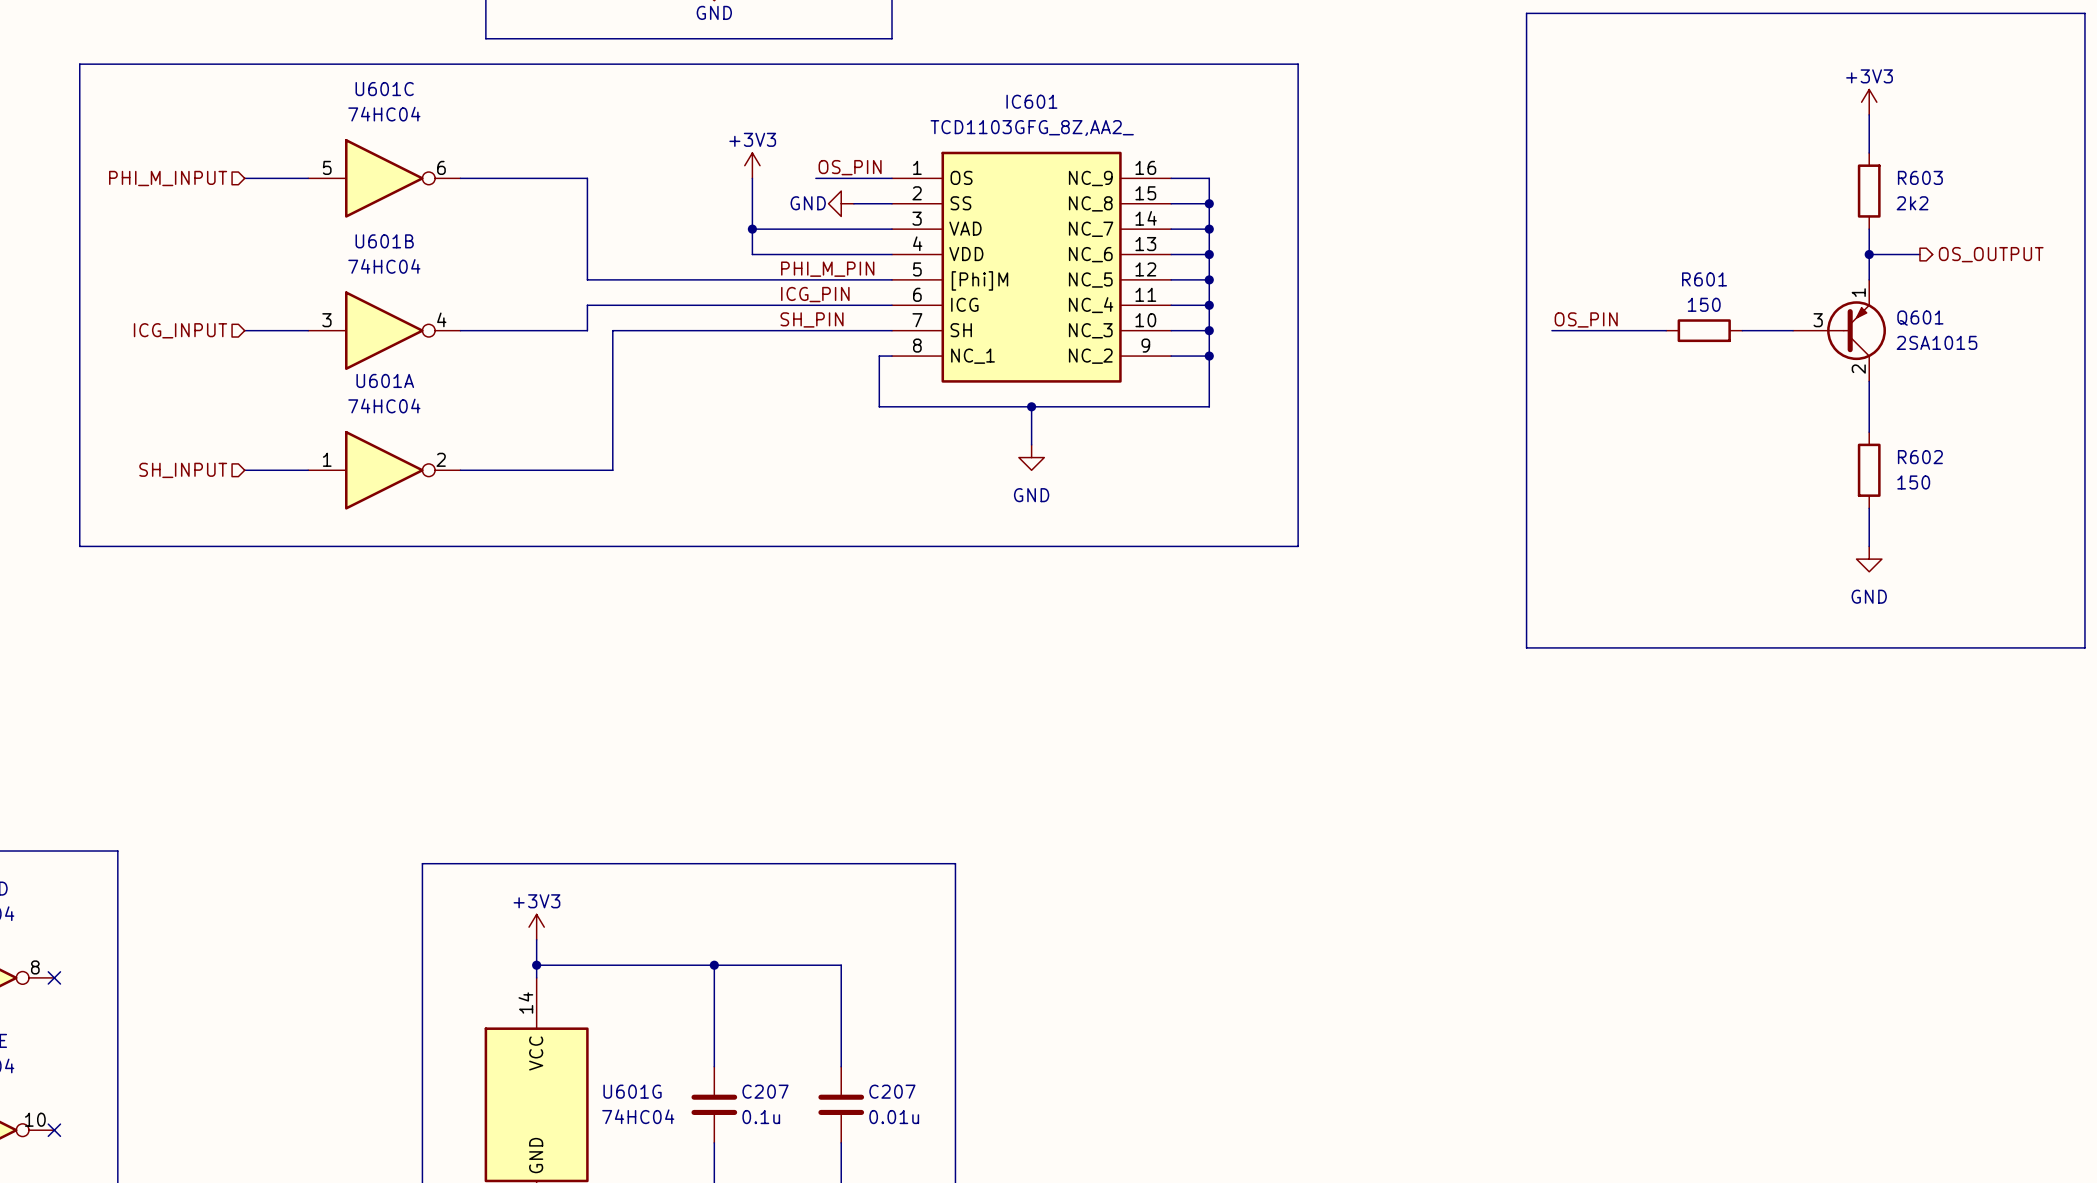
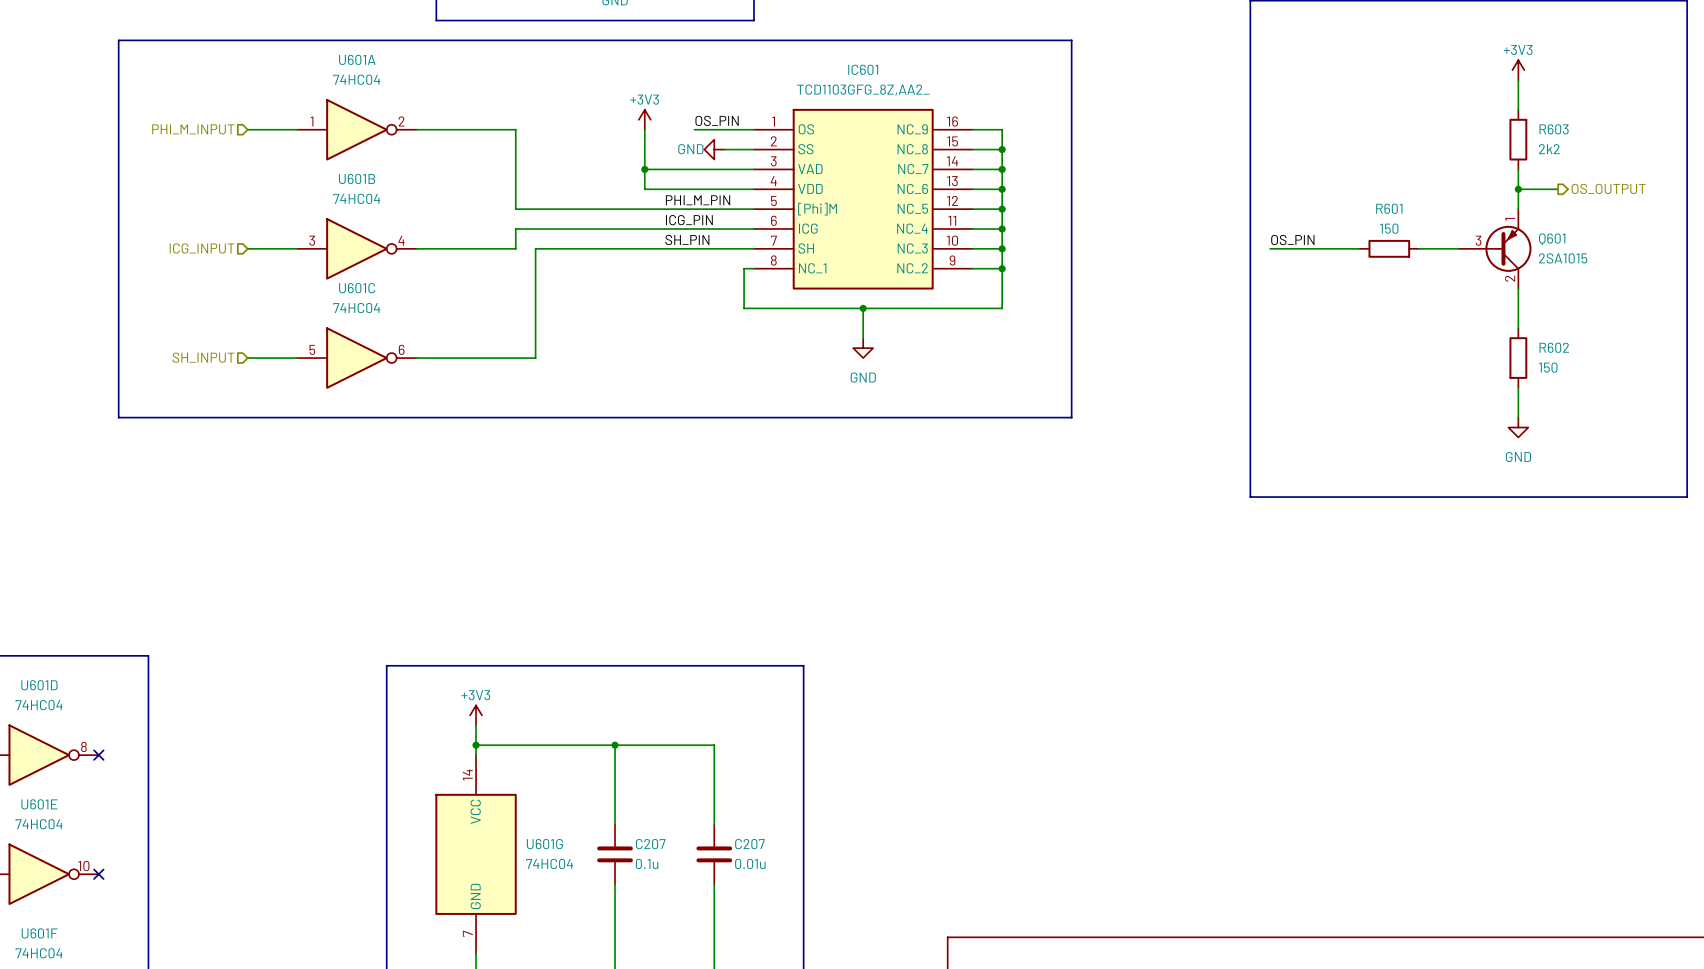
U601C position: (384, 178) -> (356, 358)
U601A position: (384, 470) -> (356, 129)

